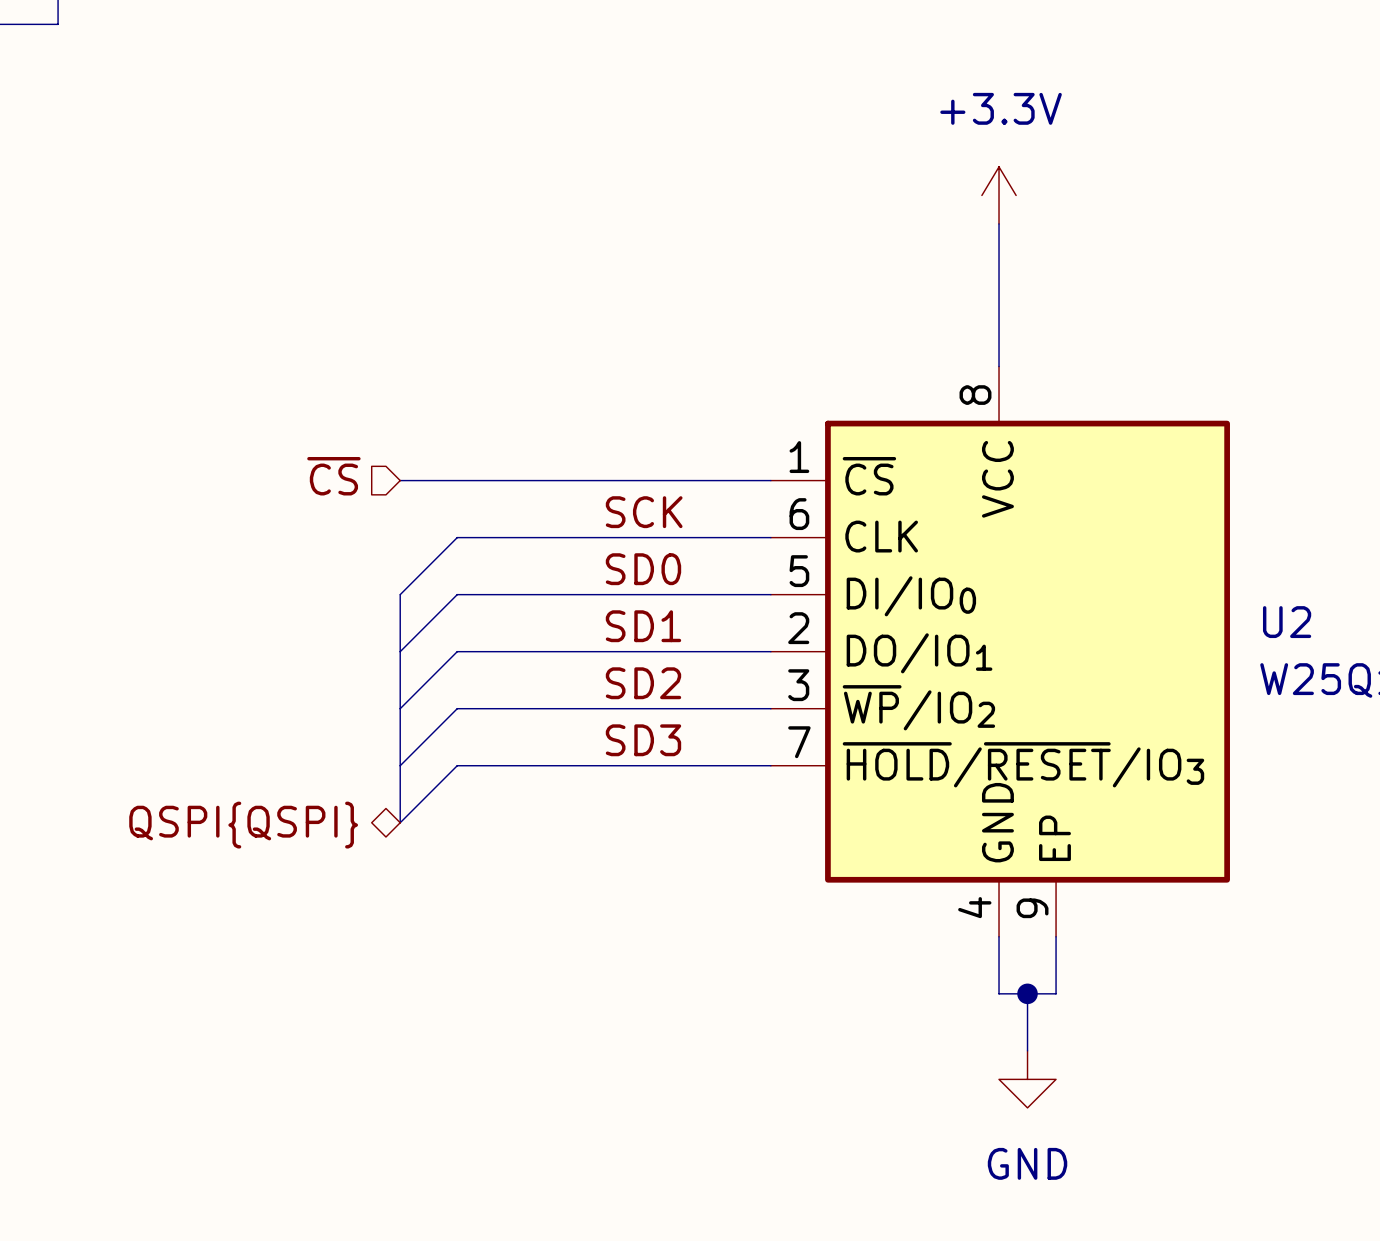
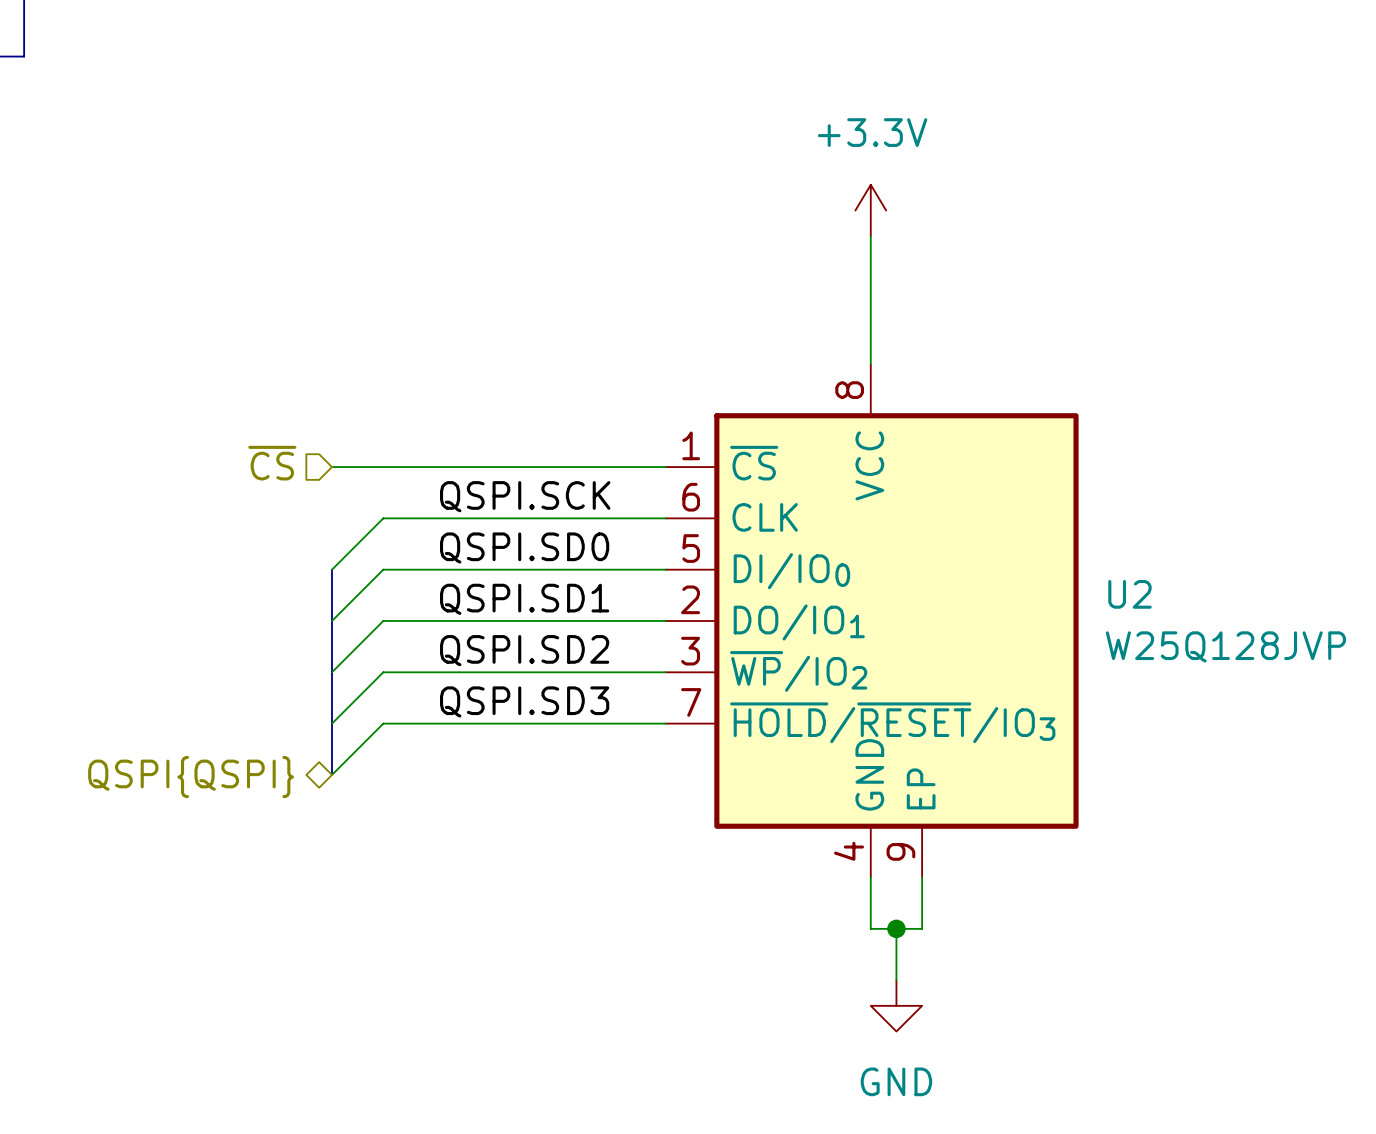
label: SCK (644, 512) -> none
label: none -> QSPI.SCK (525, 496)
label: SD0 (643, 569) -> none
label: none -> QSPI.SD0 (524, 548)
label: SD1 (643, 626) -> none
label: none -> QSPI.SD1 (524, 599)
label: SD2 (643, 683) -> none
label: none -> QSPI.SD2 (524, 650)
label: SD3 (643, 740) -> none
label: none -> QSPI.SD3 (524, 701)

